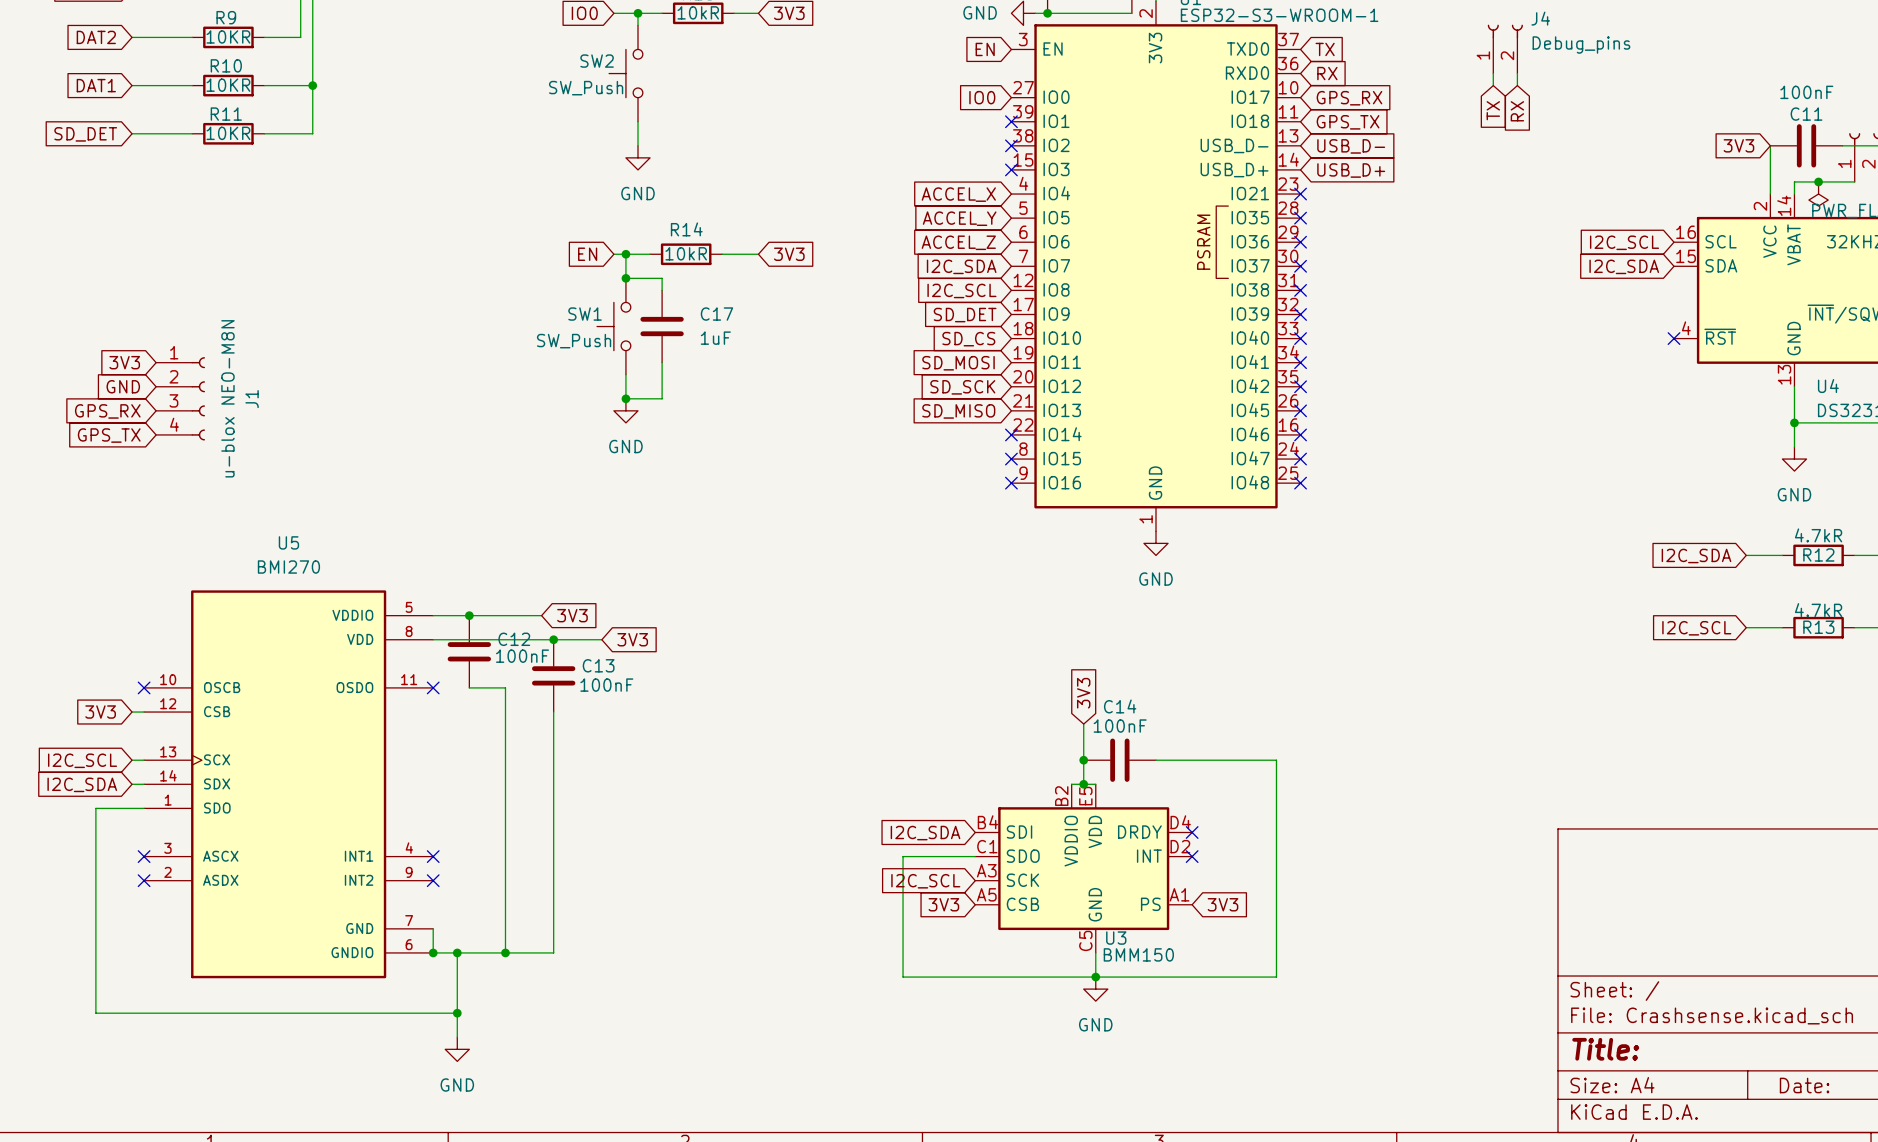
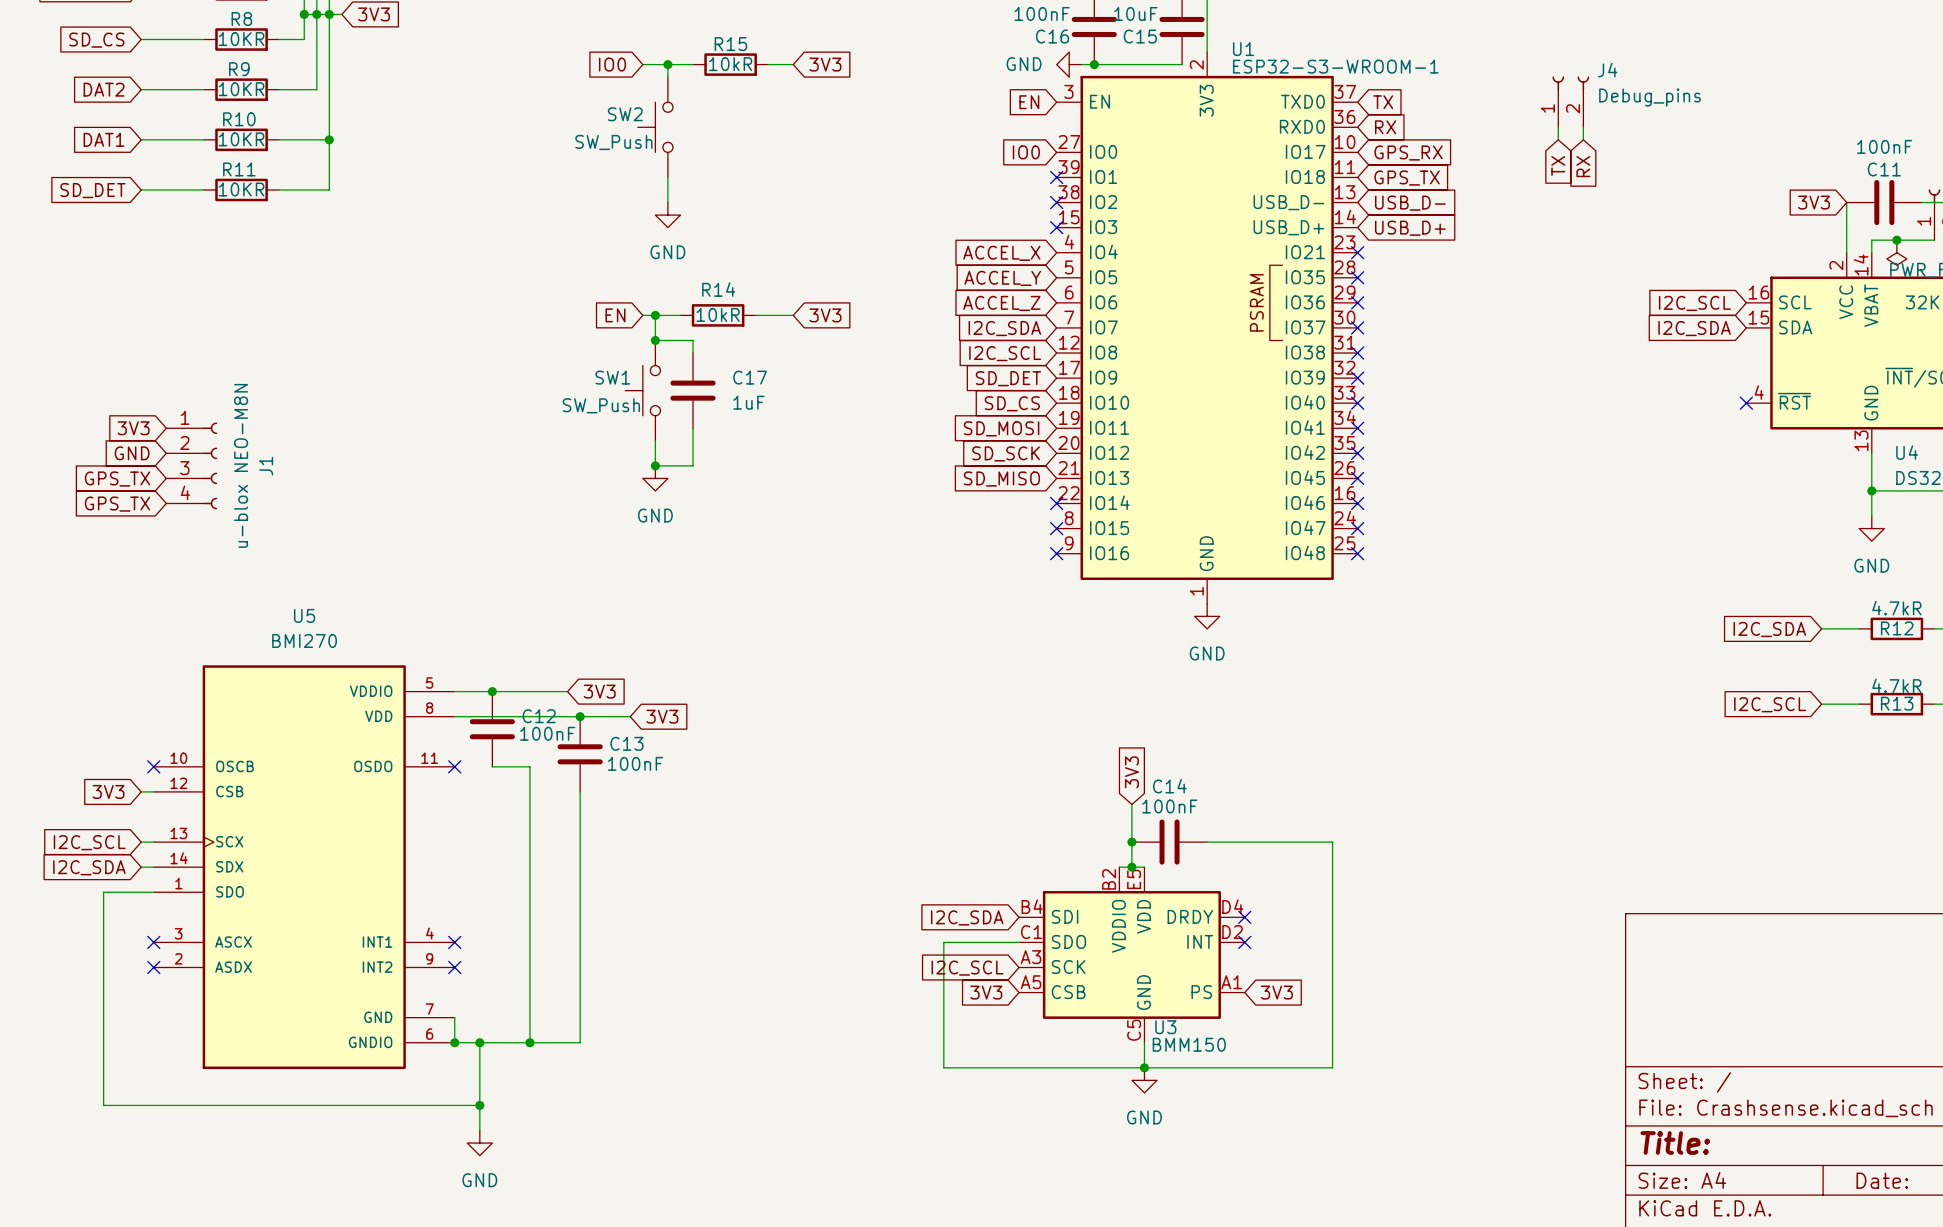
global label: GPS_RX (107, 411) -> GPS_TX (117, 479)

